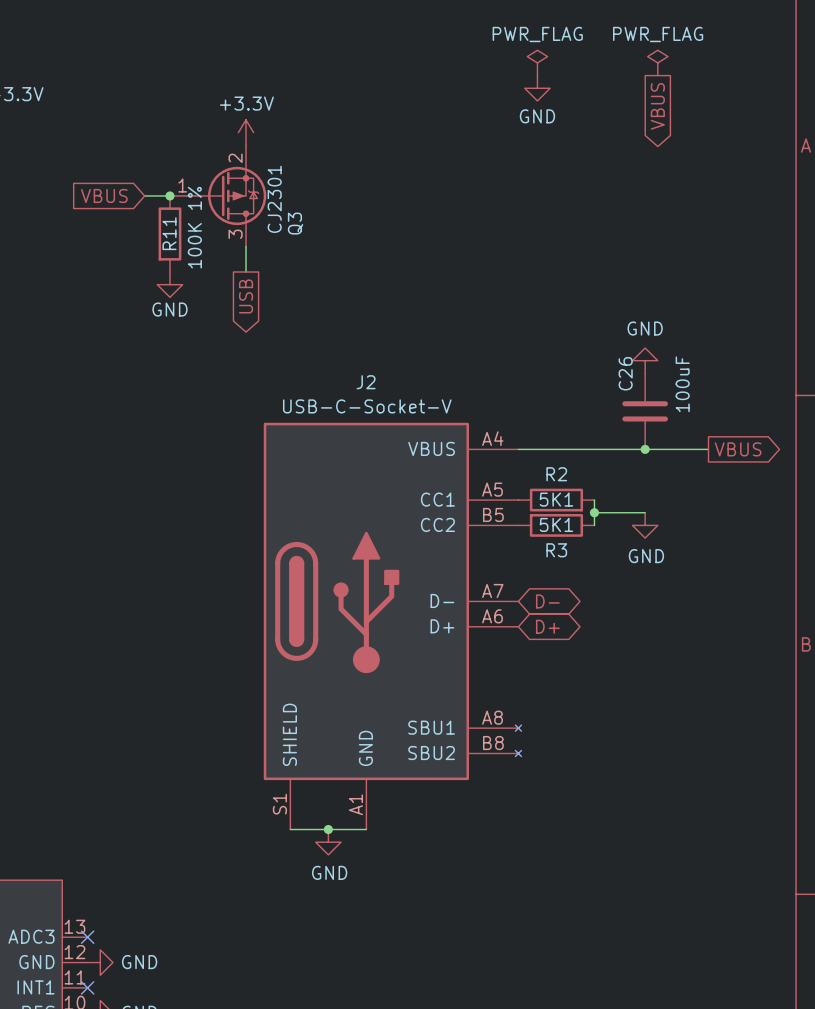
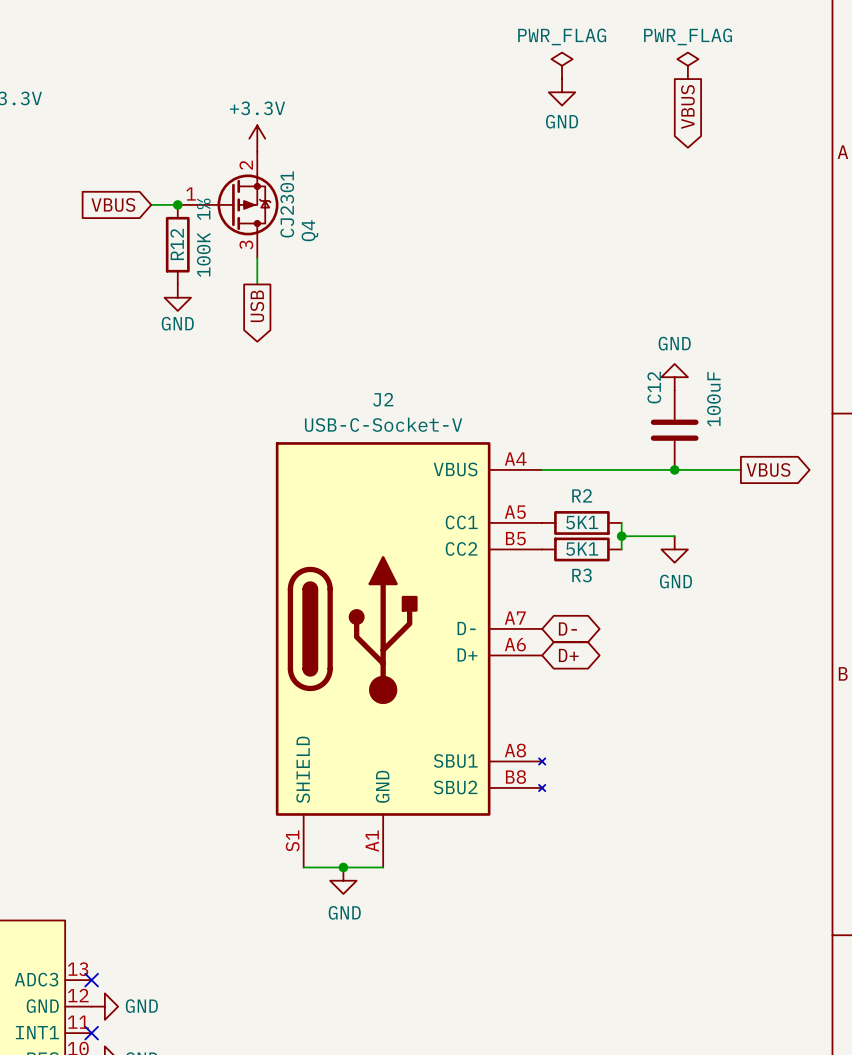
Q3 name: Q3 (295, 223) -> Q4 (309, 230)
R11 name: R11 (169, 233) -> R12 (177, 244)
C26 name: C26 (625, 373) -> C12 (654, 387)

